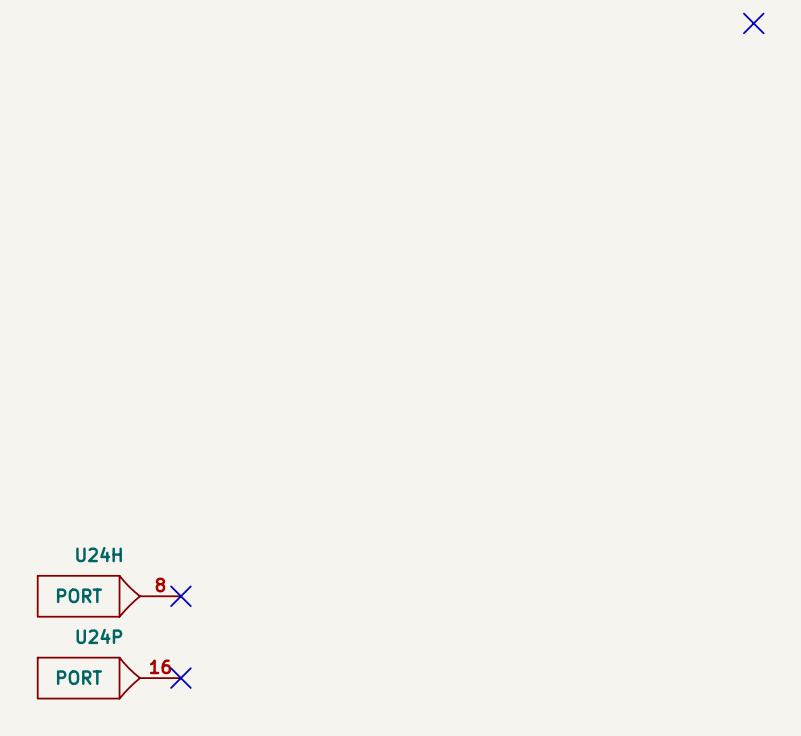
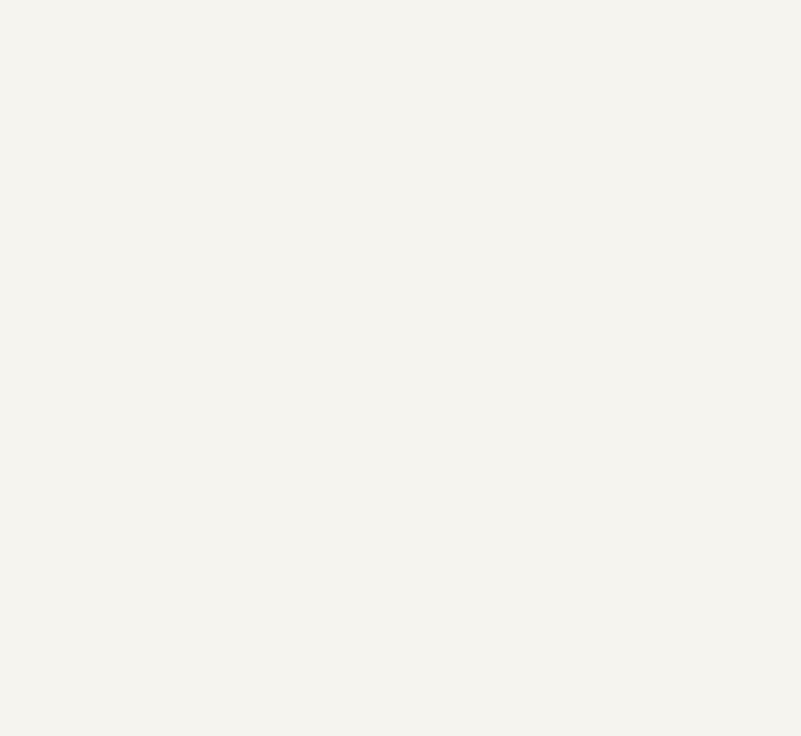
no-connect mark: (753, 23) -> none
U24H: PORT (109, 596) -> none
no-connect mark: (180, 596) -> none
U24P: PORT (109, 678) -> none
no-connect mark: (180, 678) -> none

